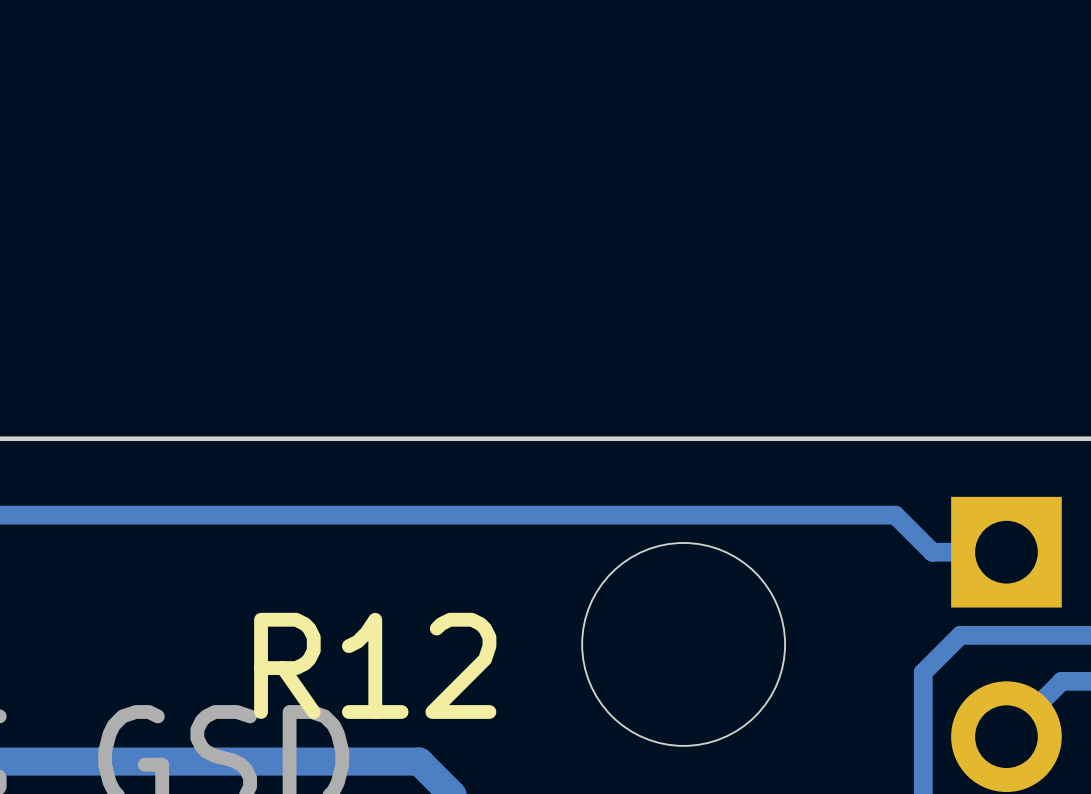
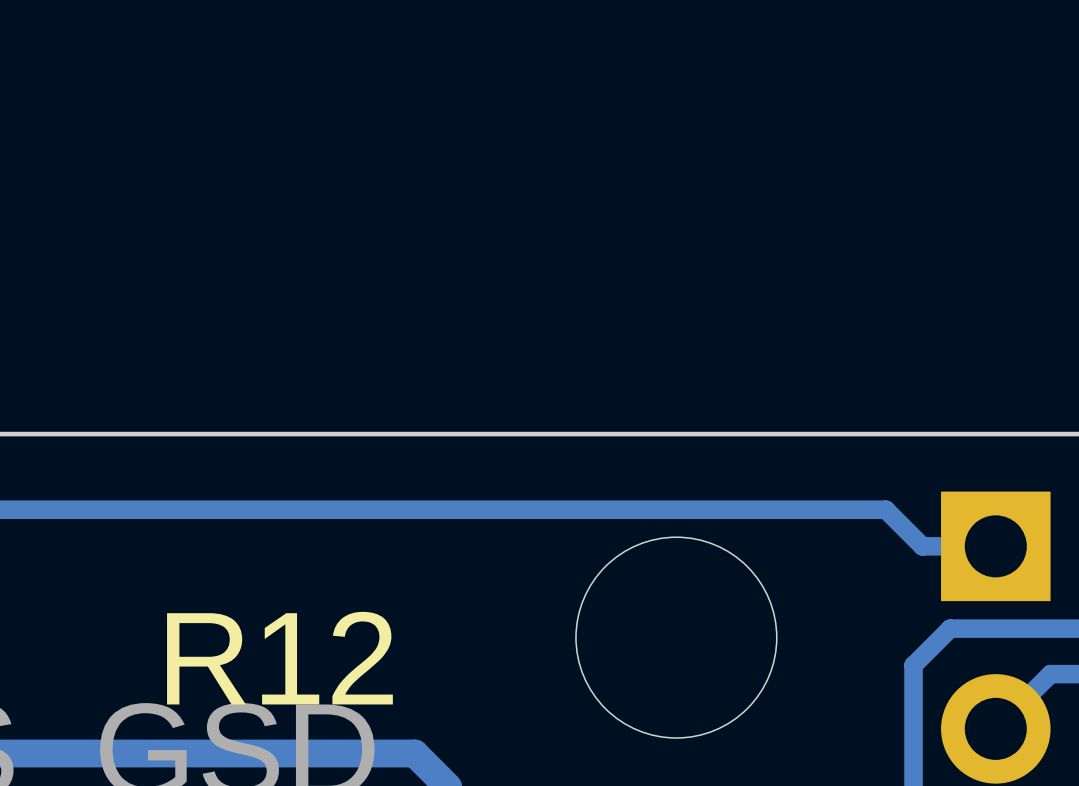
R12 name position: R12 (375, 665) -> R12 (279, 658)

